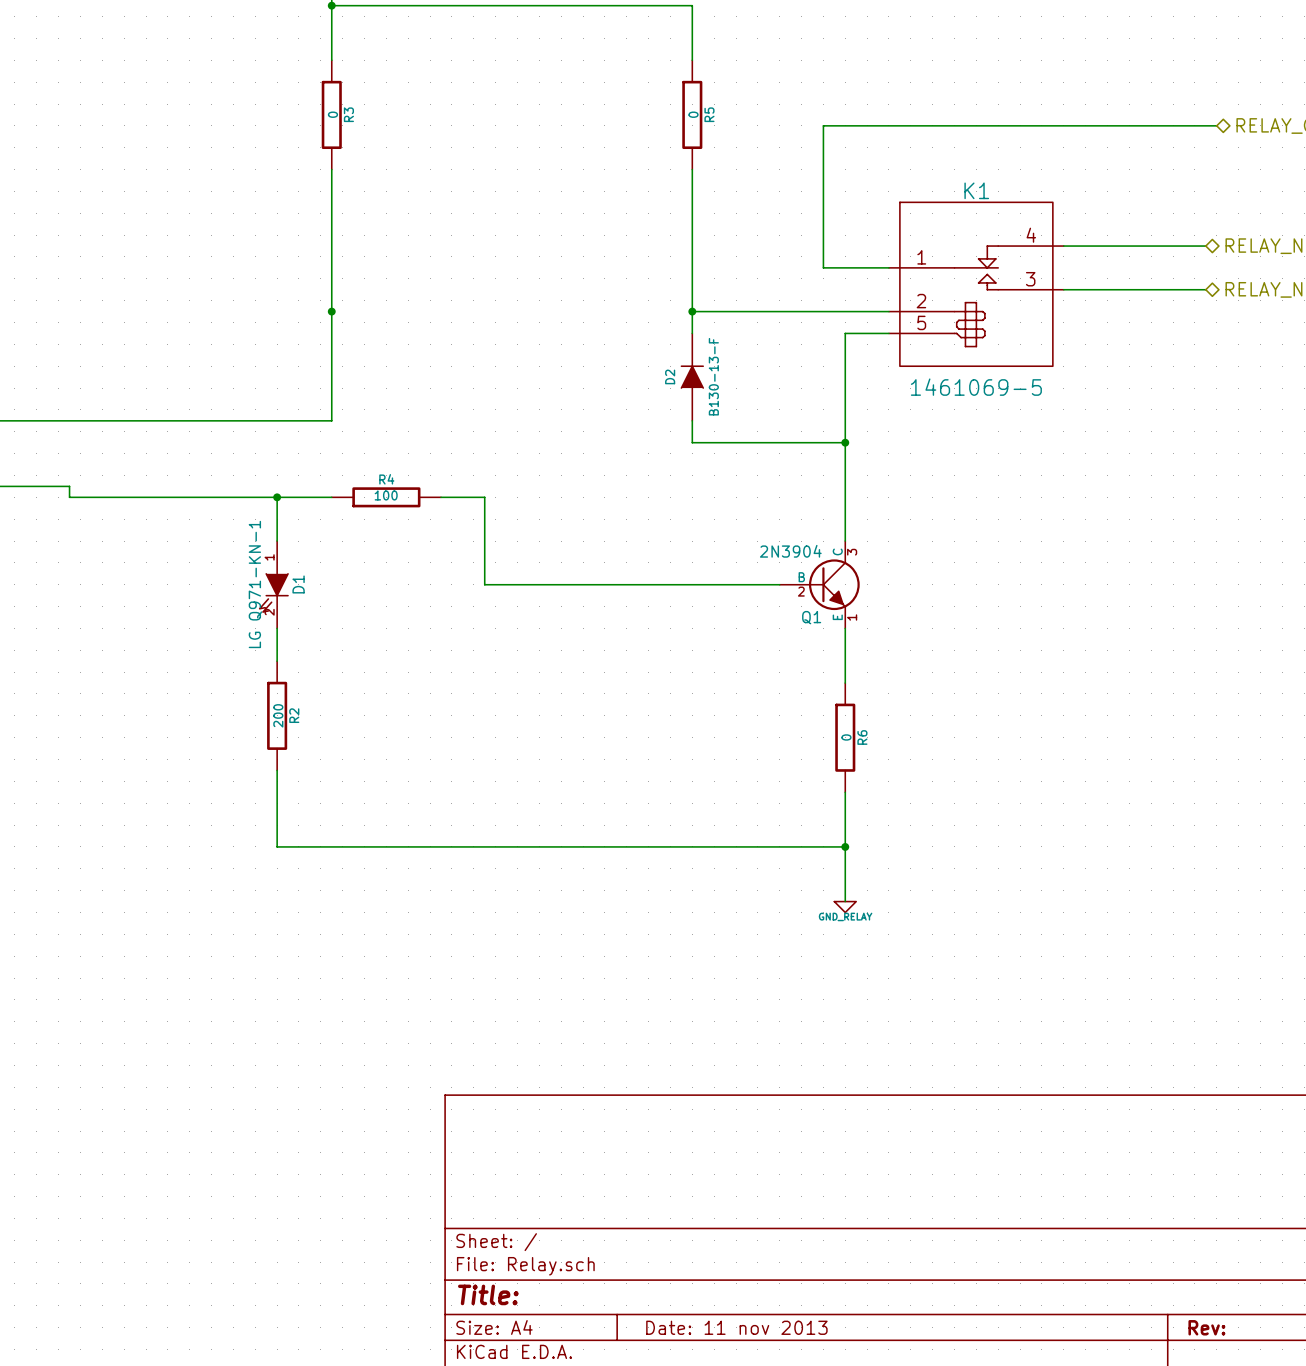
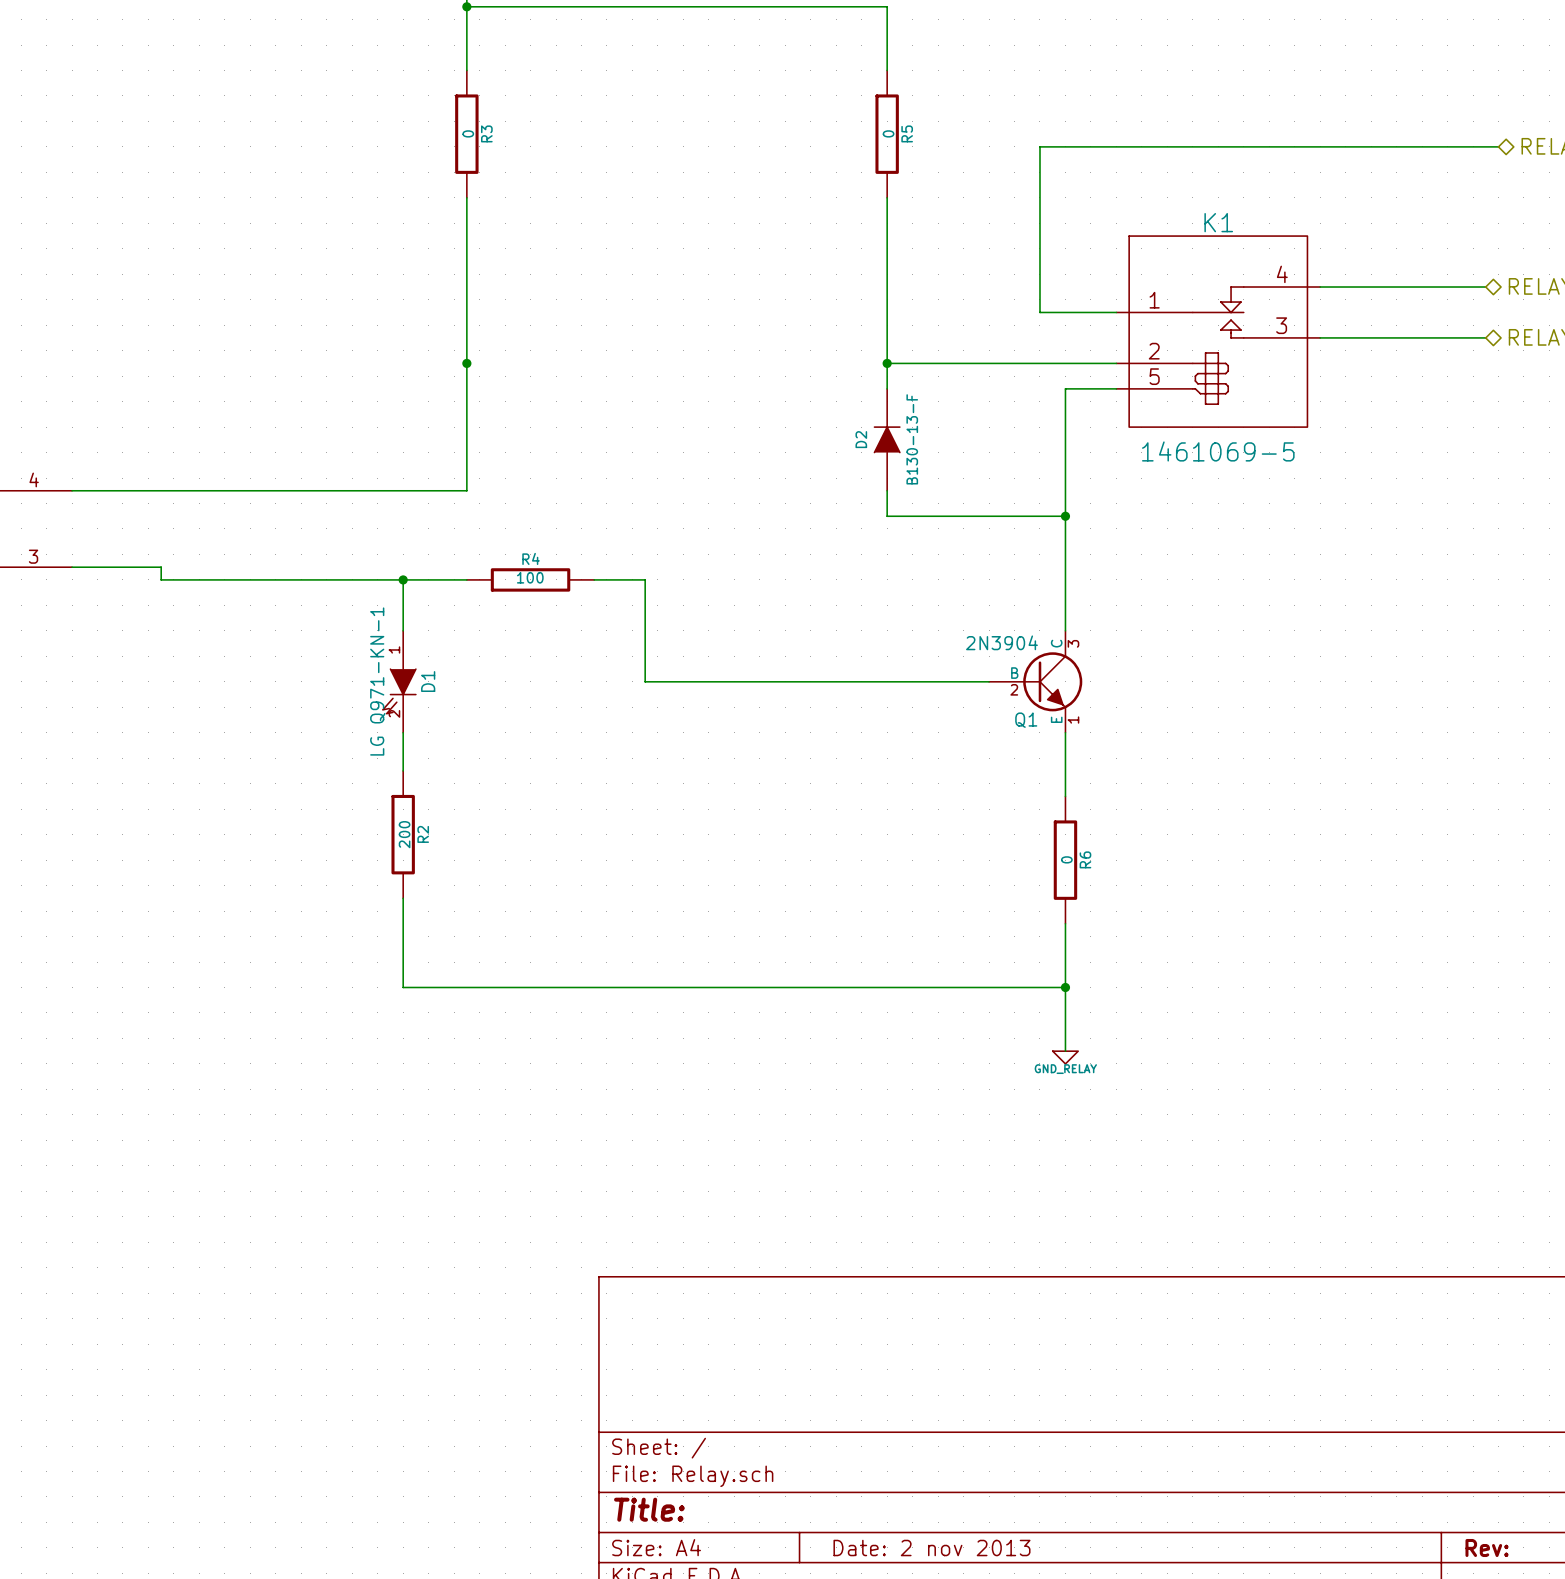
title block: Date: 11 nov 2013 (736, 1327) -> Date: 2 nov 2013 (931, 1548)

